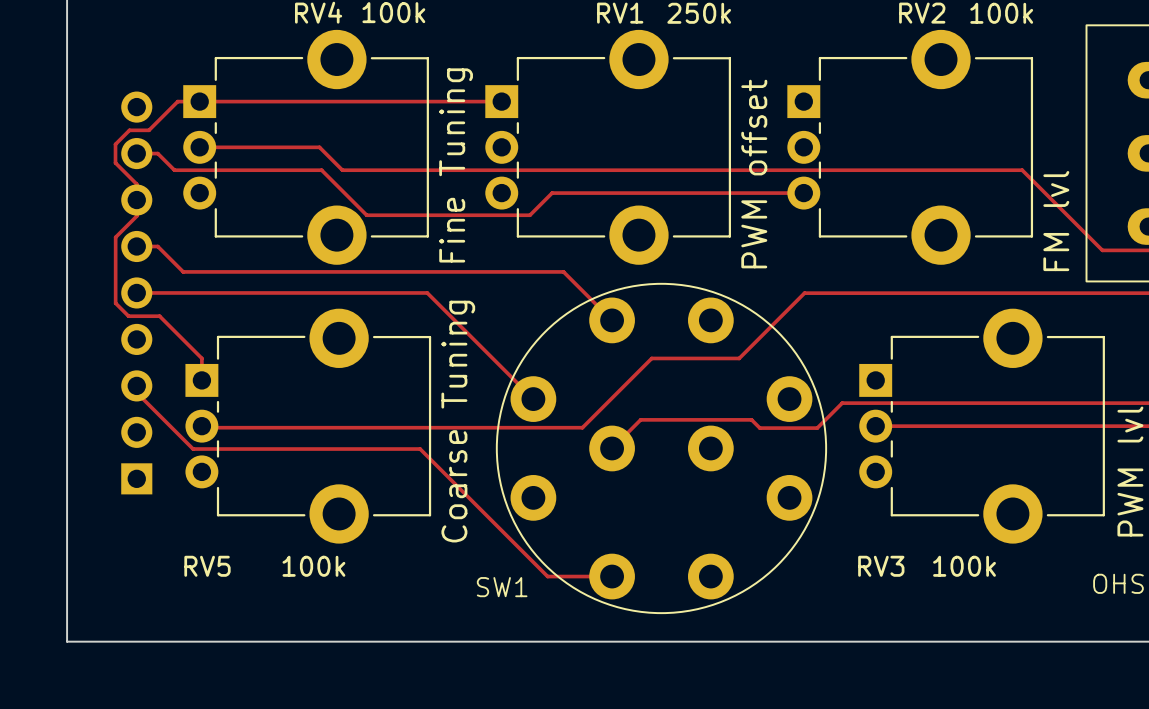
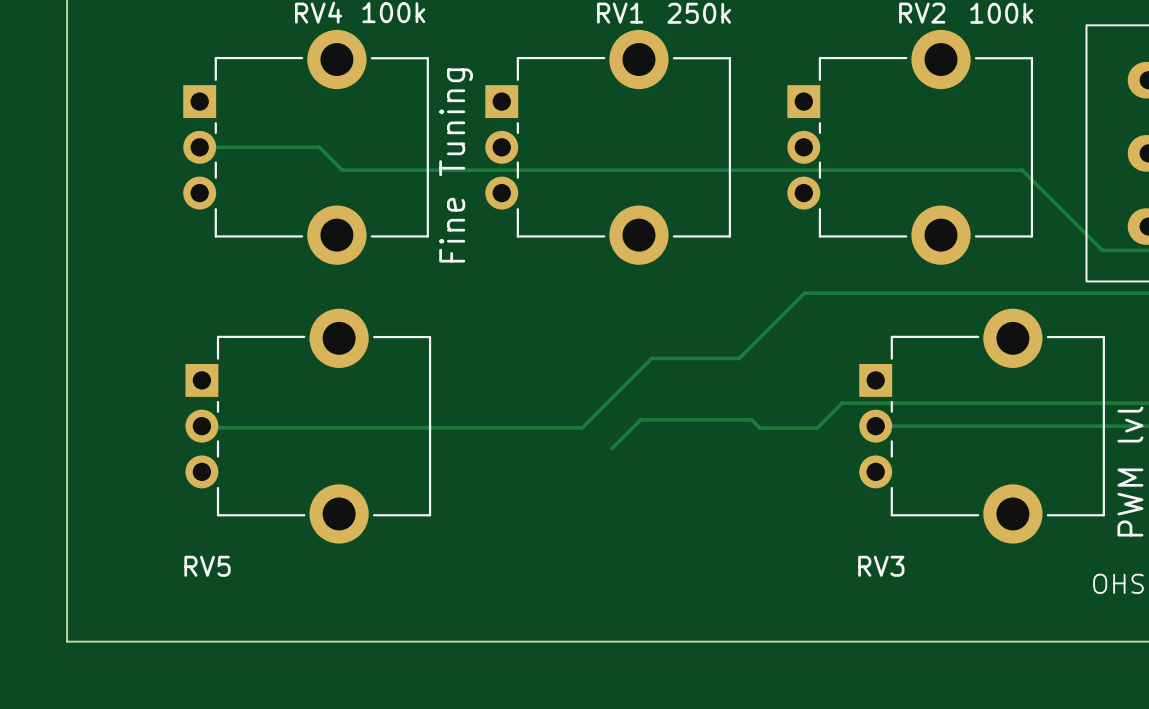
track: (501, 101) (177, 101) (149, 130) (129, 130) (115, 144) (115, 162) (136, 184) (136, 216) (115, 237) (115, 303) (128, 316) (159, 316) (201, 358) (201, 380) -> none
track: (136, 153) (157, 153) (174, 170) (321, 170) (366, 215) (529, 215) (552, 193) (803, 193) -> none
RV1 text: PWM offset (754, 174) -> none
RV2 text: FM lvl (1056, 221) -> none
track: (136, 246) (157, 246) (183, 271) (563, 271) (612, 320) -> none
track: (136, 292) (427, 292) (533, 399) -> none
part: (136, 292) -> none
track: (136, 385) (136, 392) (193, 449) (420, 449) (547, 576) (612, 576) -> none
RV5 text: Coarse Tuning (458, 421) -> none
SW1: (661, 448) -> none
RV5 value: 100k (313, 566) -> none
RV3 value: 100k (964, 566) -> none

